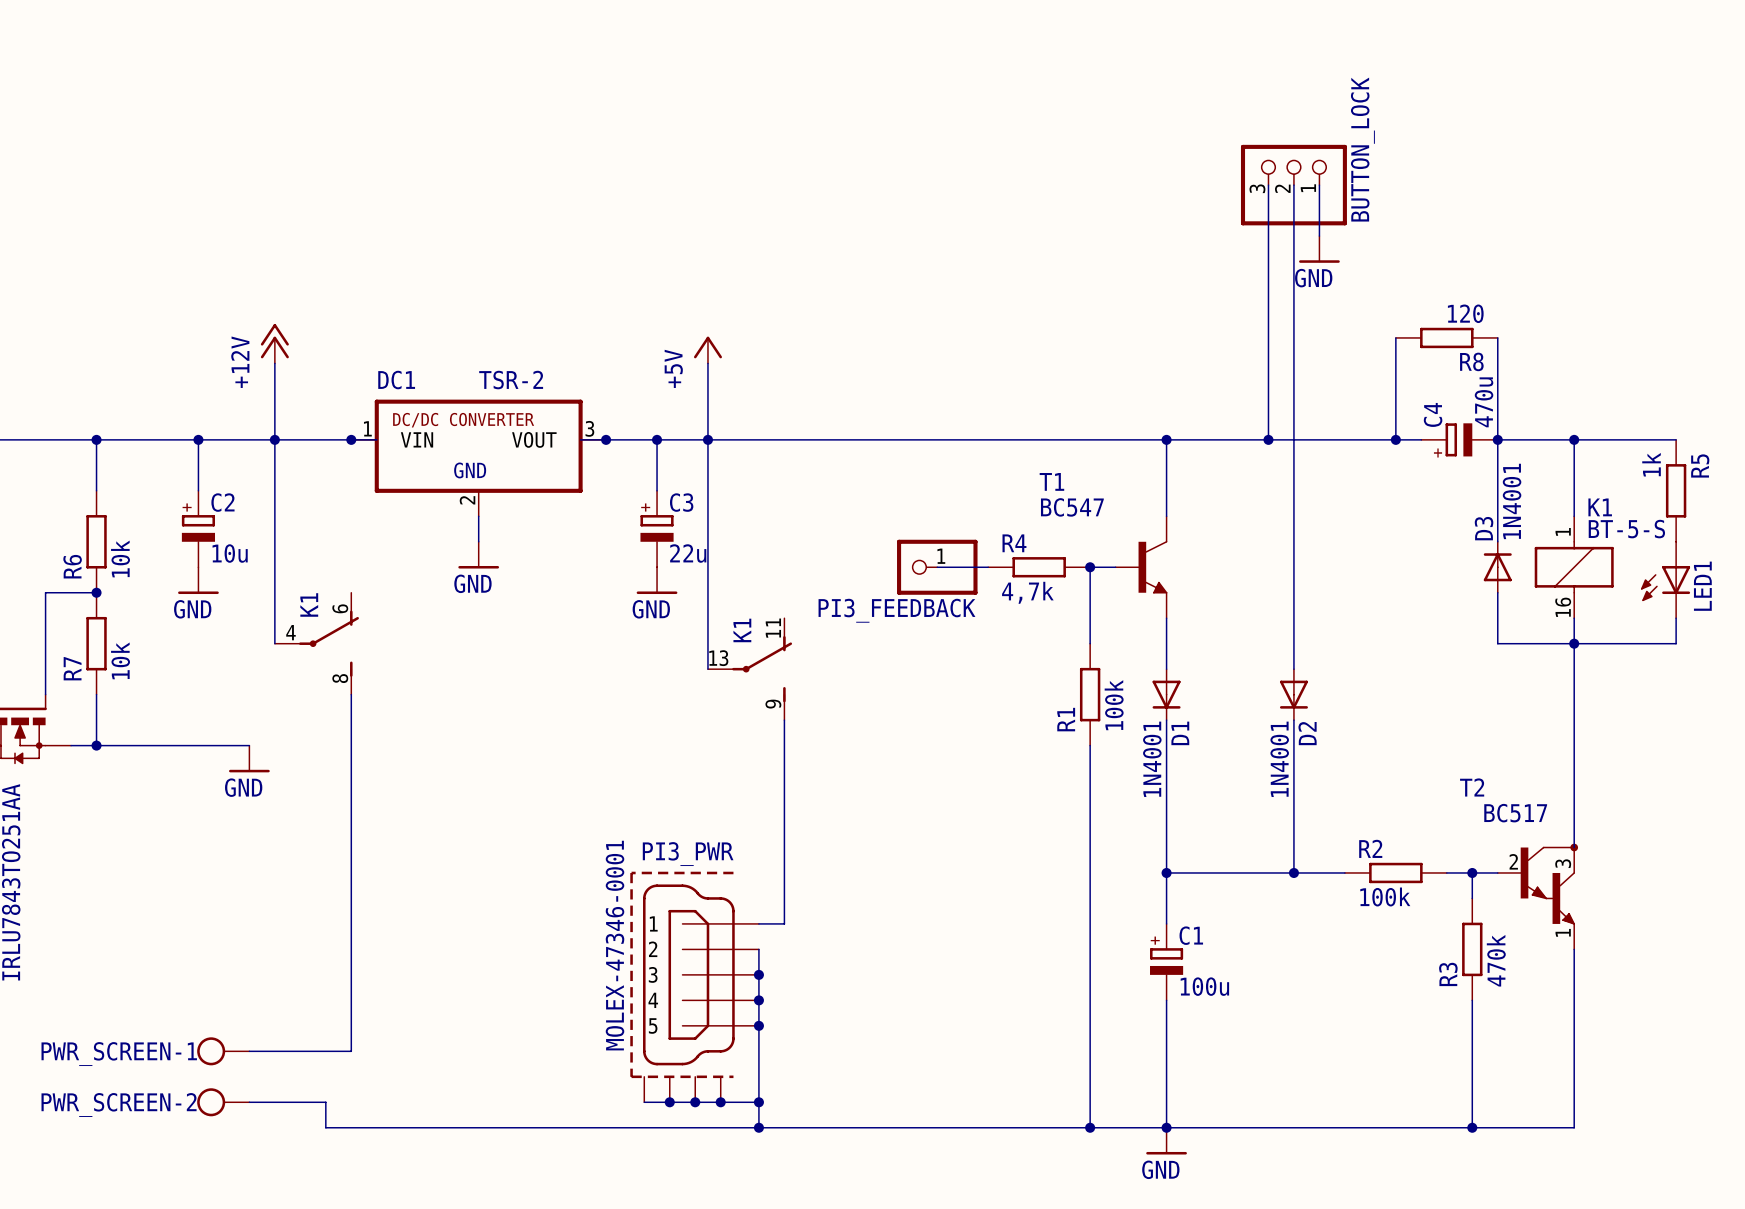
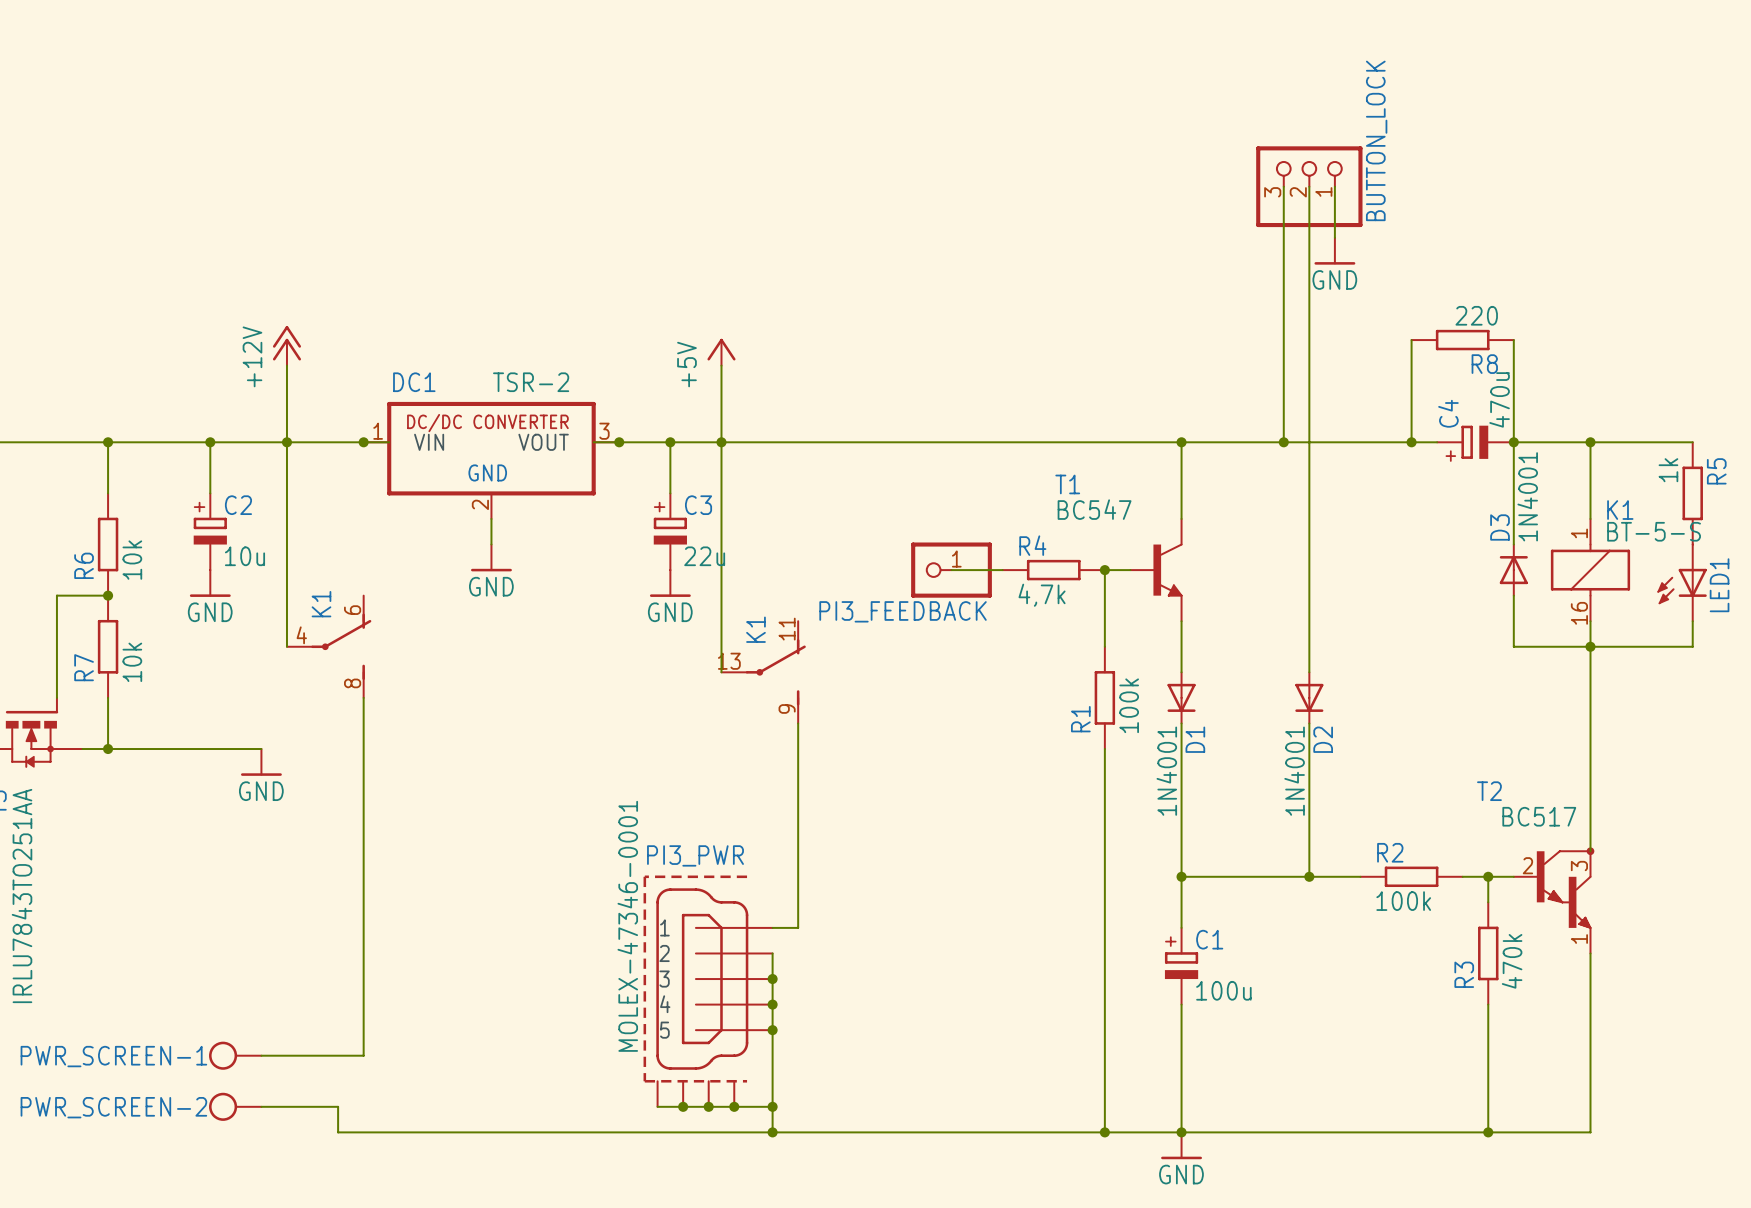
R8 value: 120 (1465, 313) -> 220 (1476, 315)

